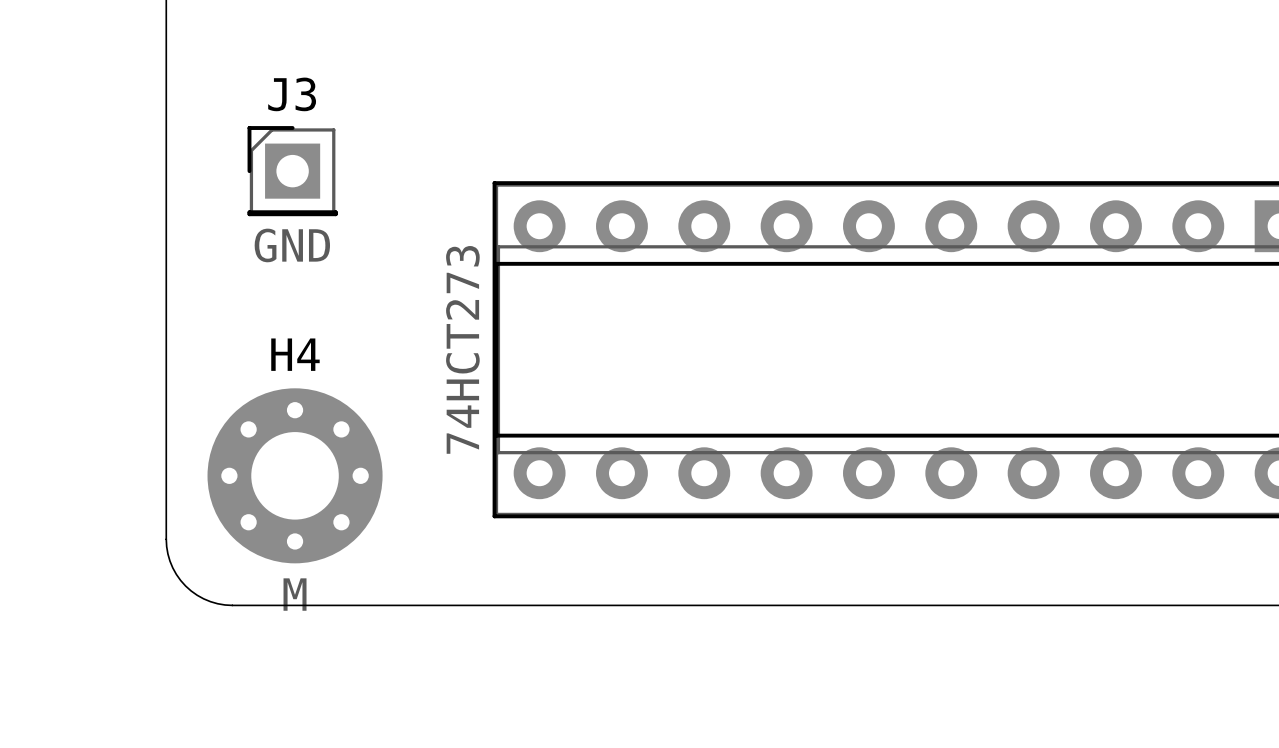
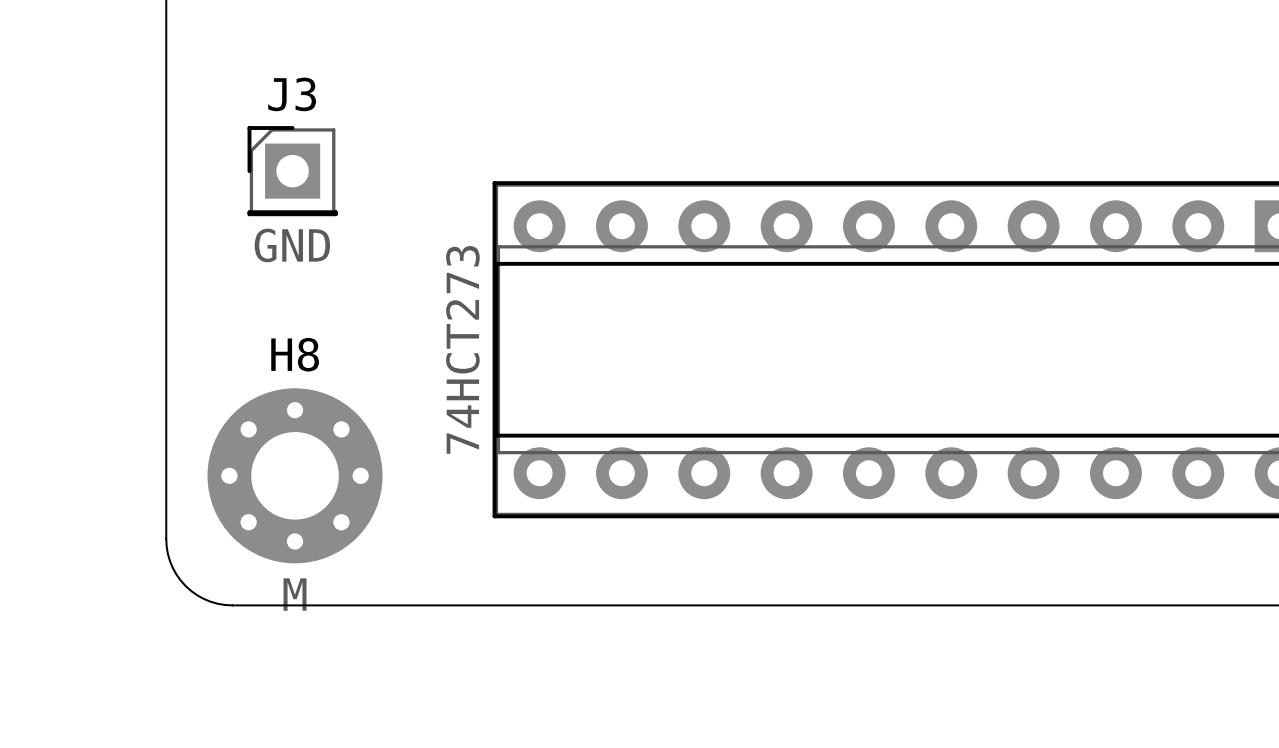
H4 name: H4 (295, 354) -> H8 (295, 354)

